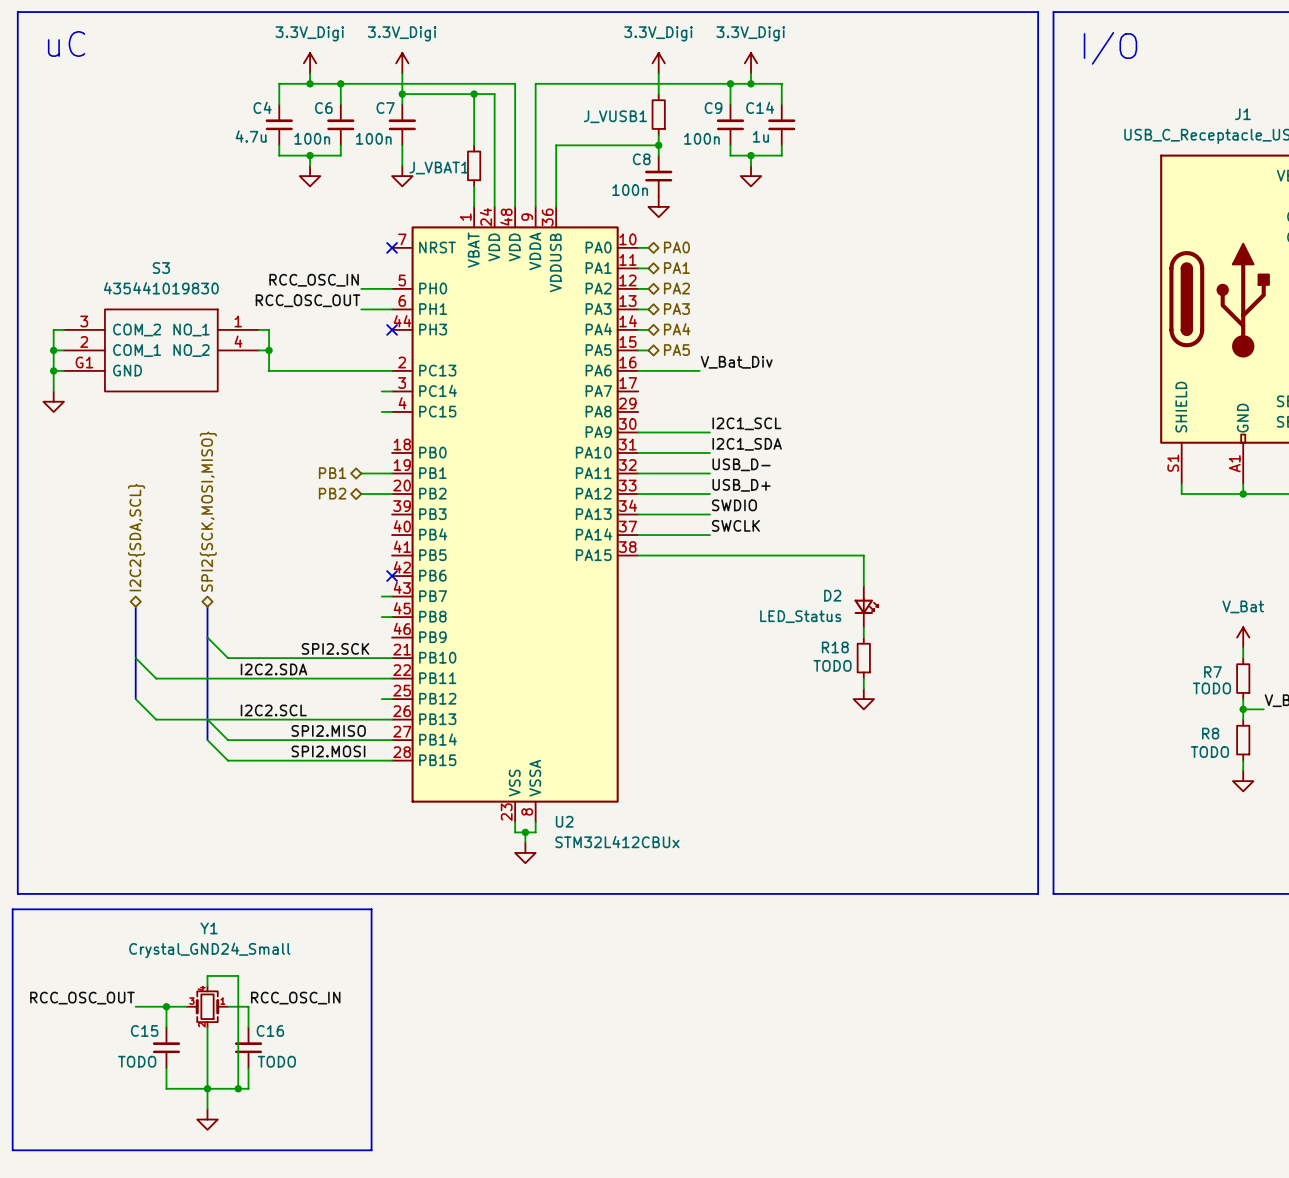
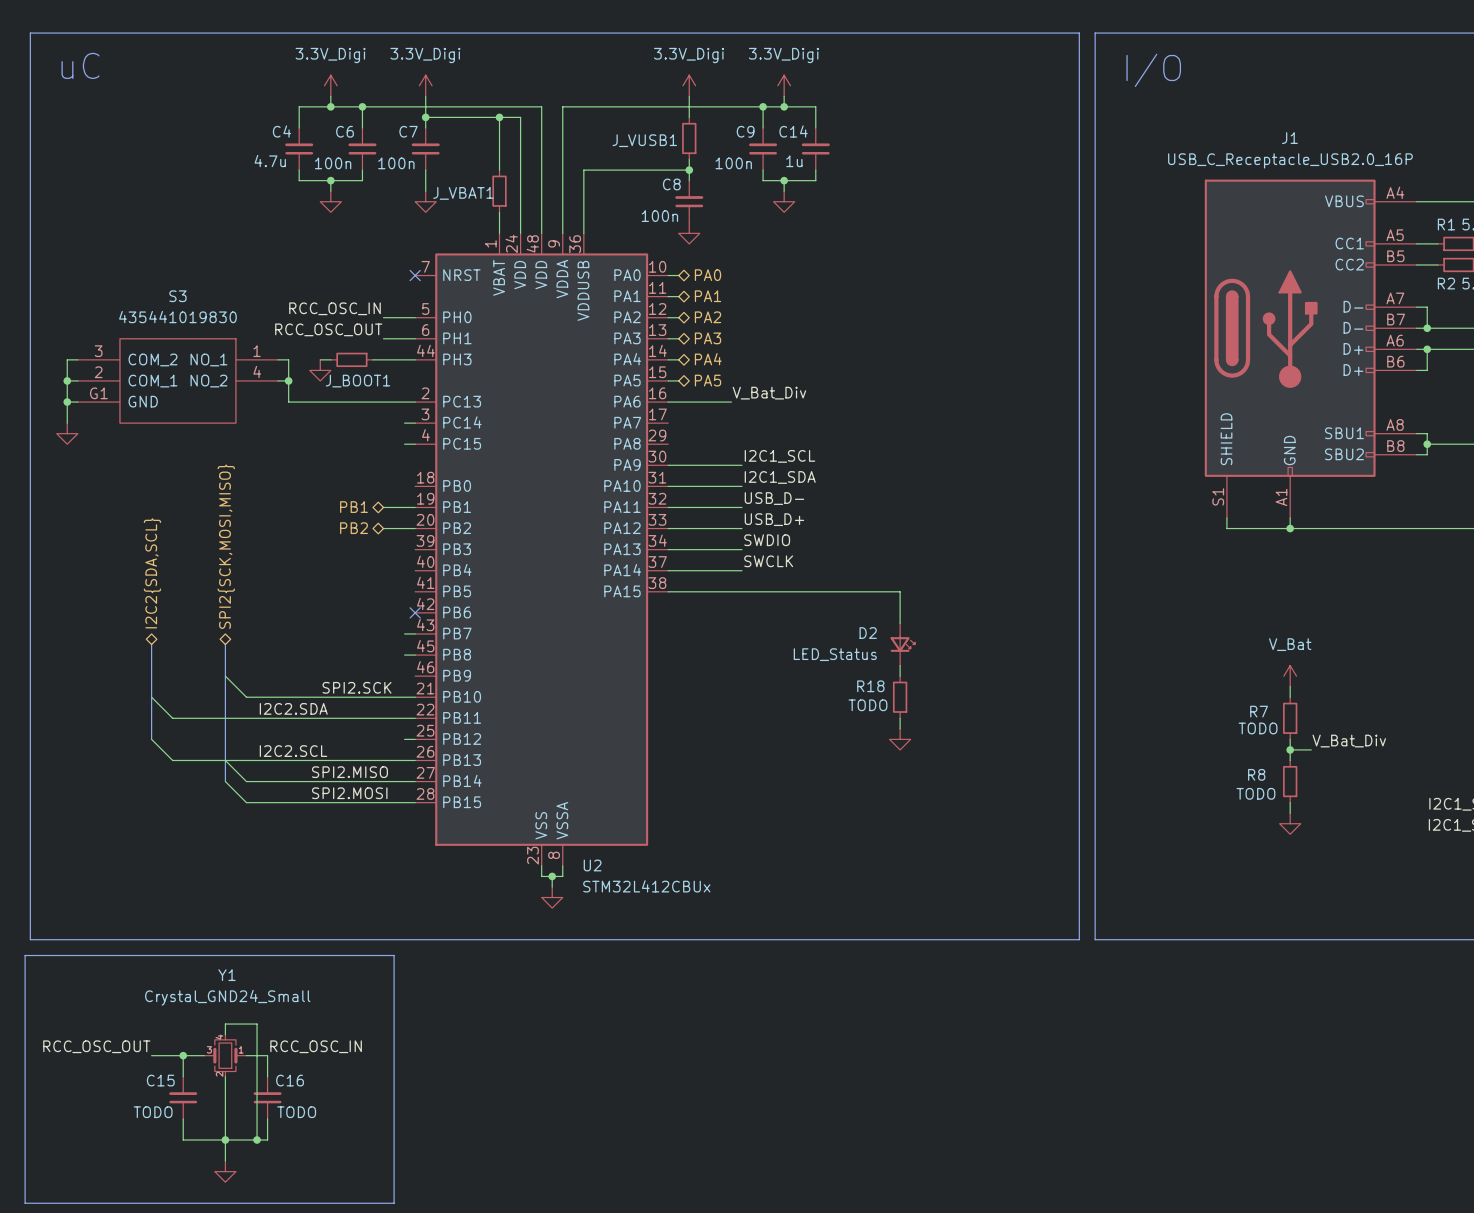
wire: none -> (320, 359) (330, 359)
J_BOOT1: none -> (351, 359)
wire: none -> (372, 359) (415, 359)
no-connect mark: (392, 329) -> none
power symbol: none -> (320, 370)

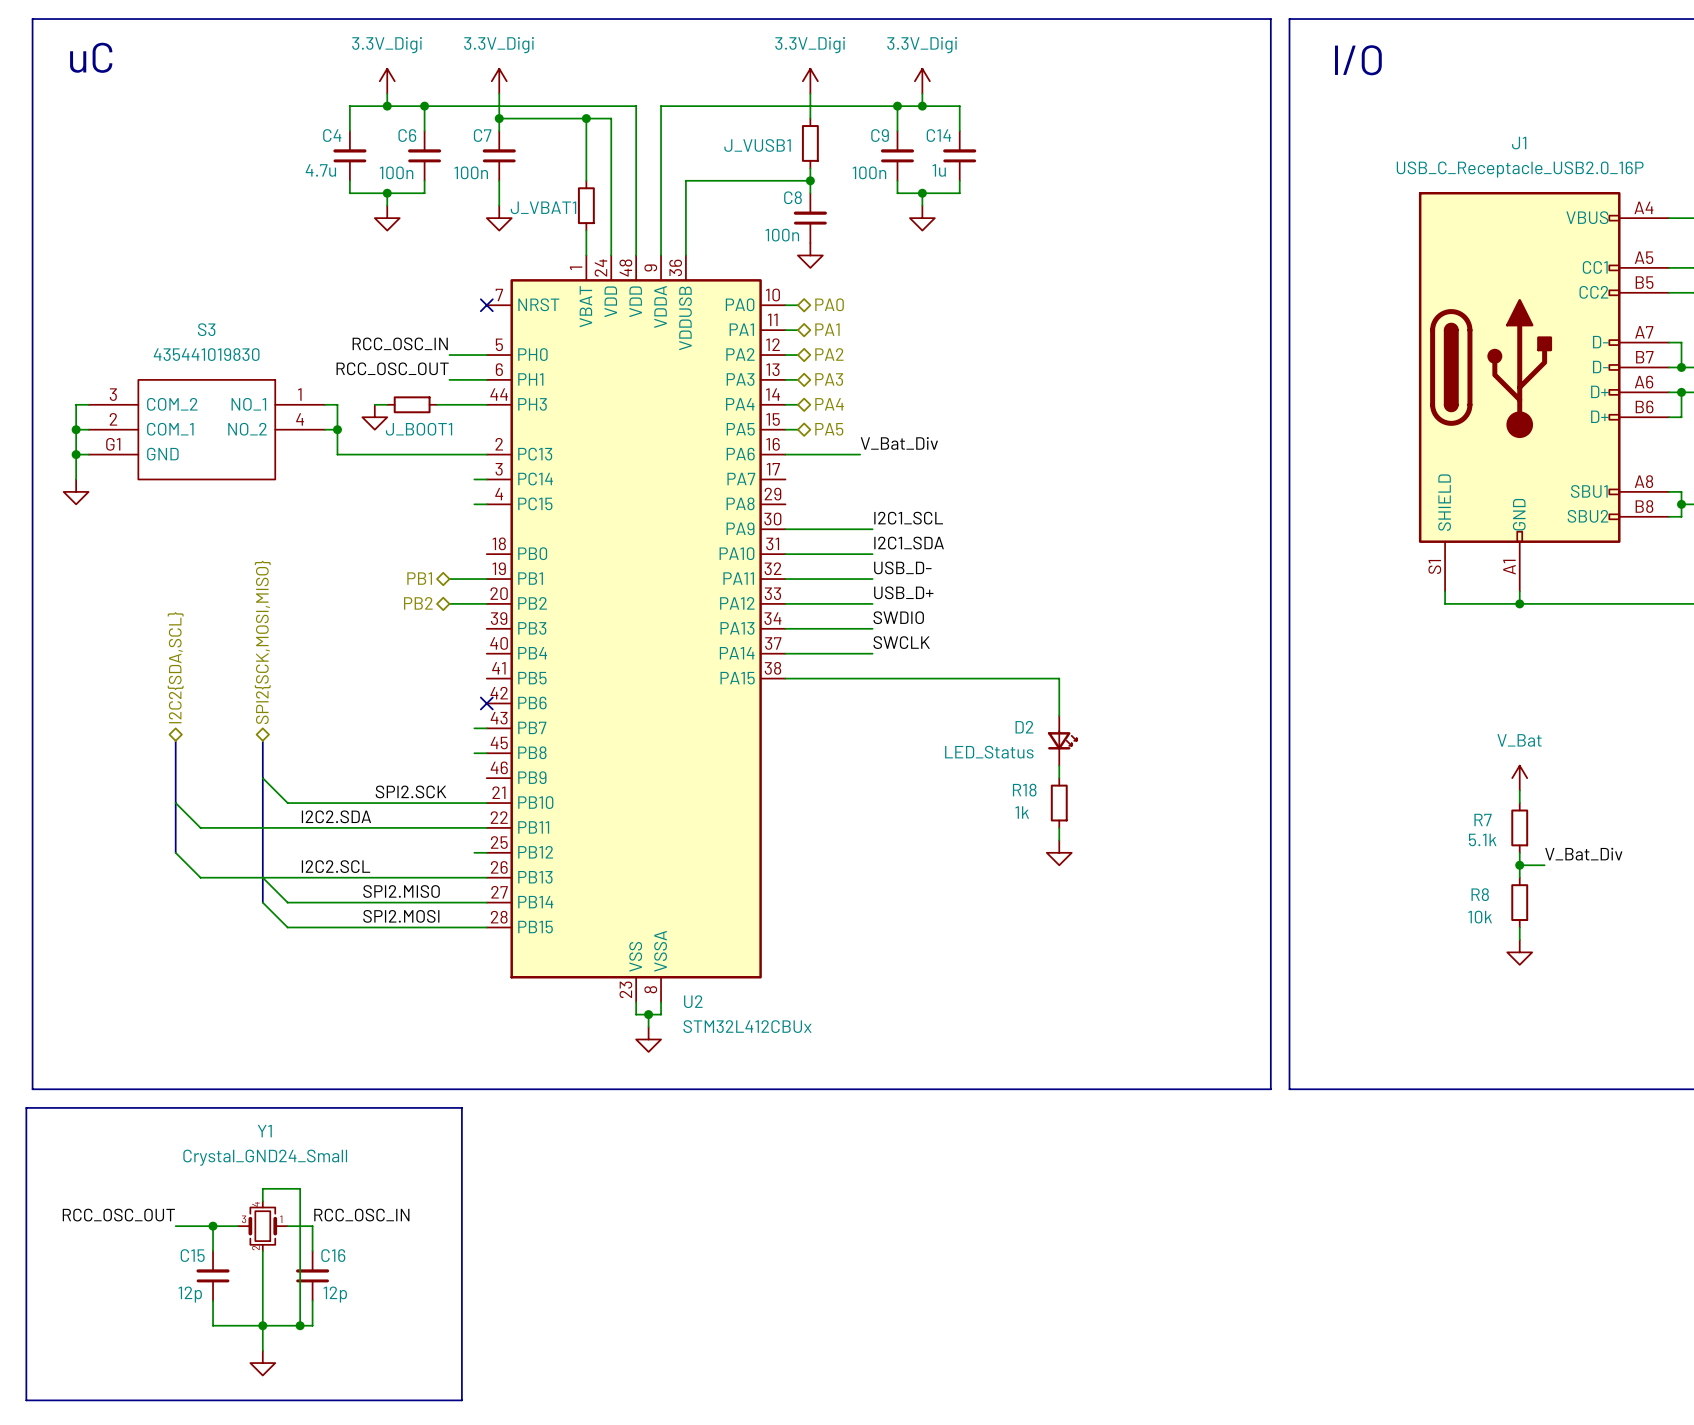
R18 value: TODO (867, 705) -> 1k (1022, 812)
R7 value: TODO (1258, 728) -> 5.1k (1482, 839)
R8 value: TODO (1255, 793) -> 10k (1480, 917)
C15 value: TODO (153, 1112) -> 12p (190, 1294)
C16 value: TODO (296, 1112) -> 12p (335, 1294)

